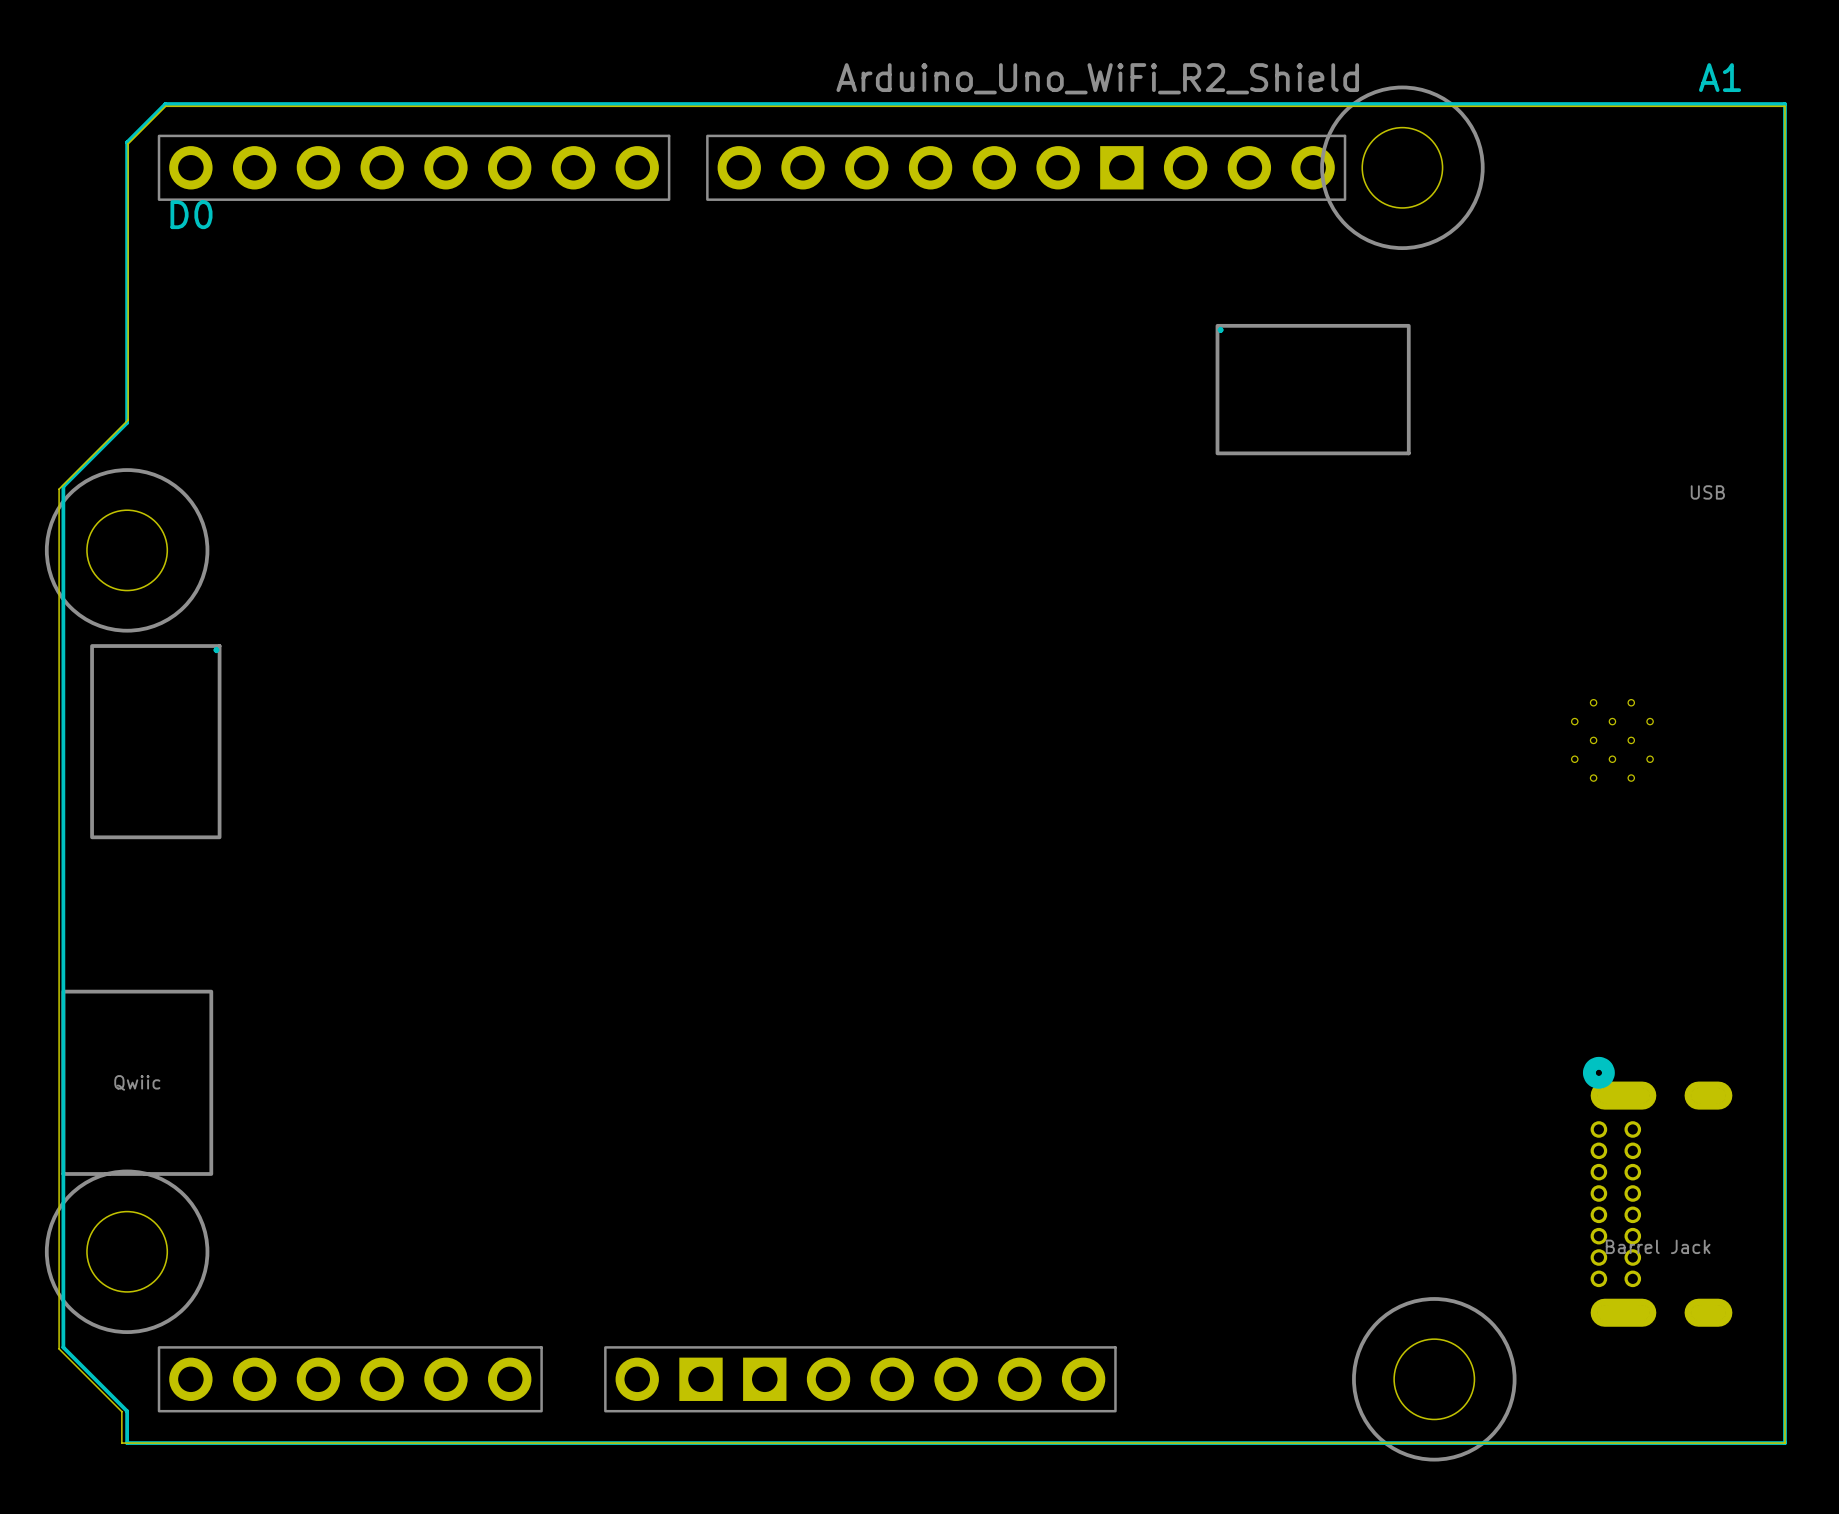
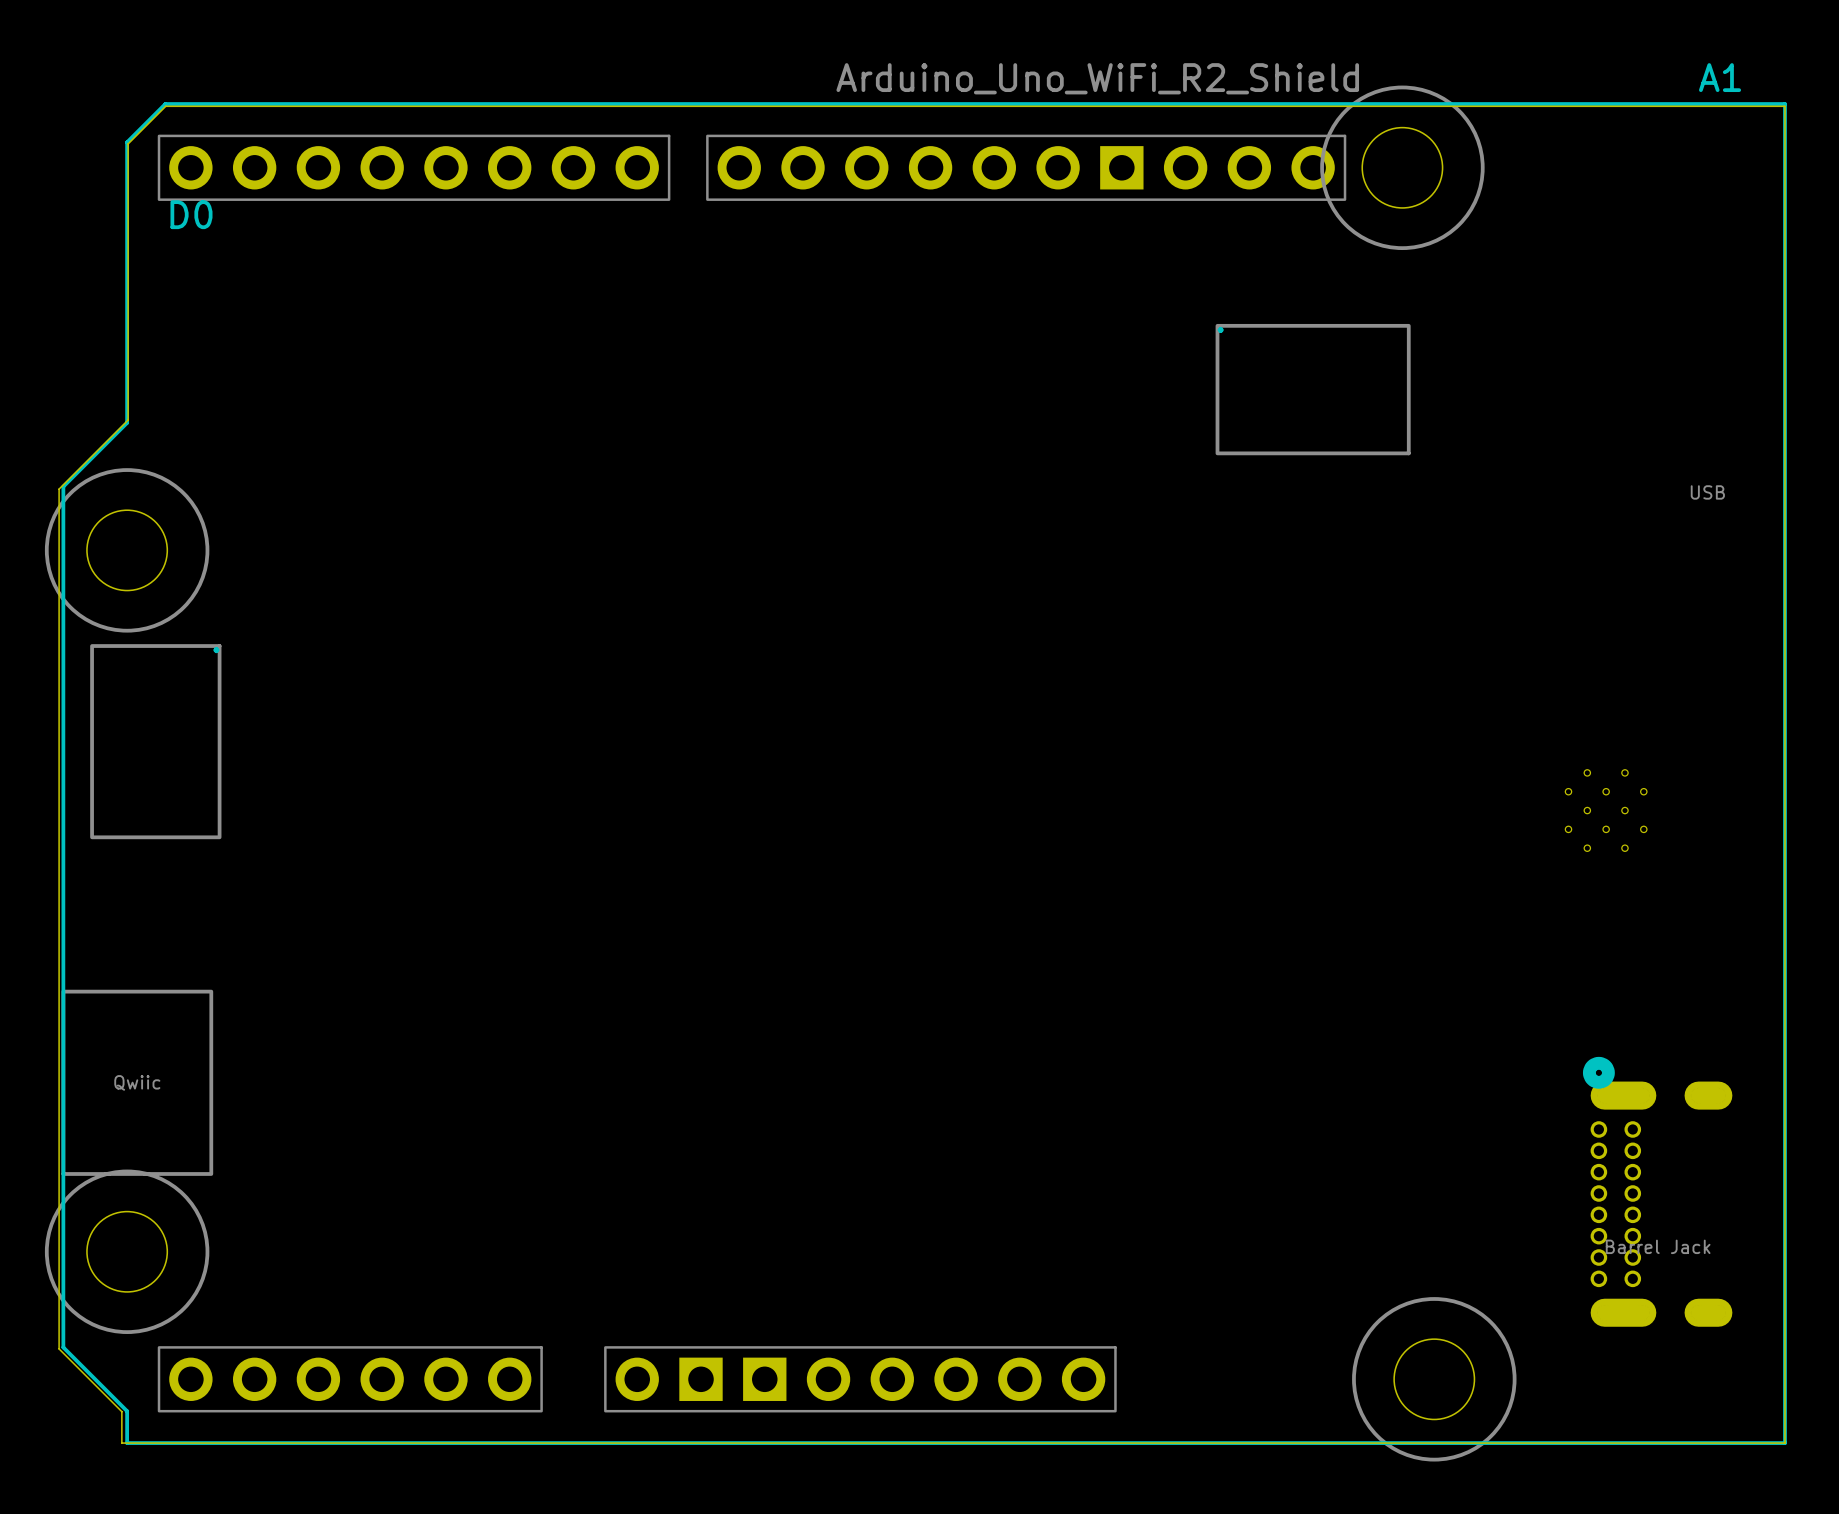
part position: (1612, 740) -> (1606, 810)

